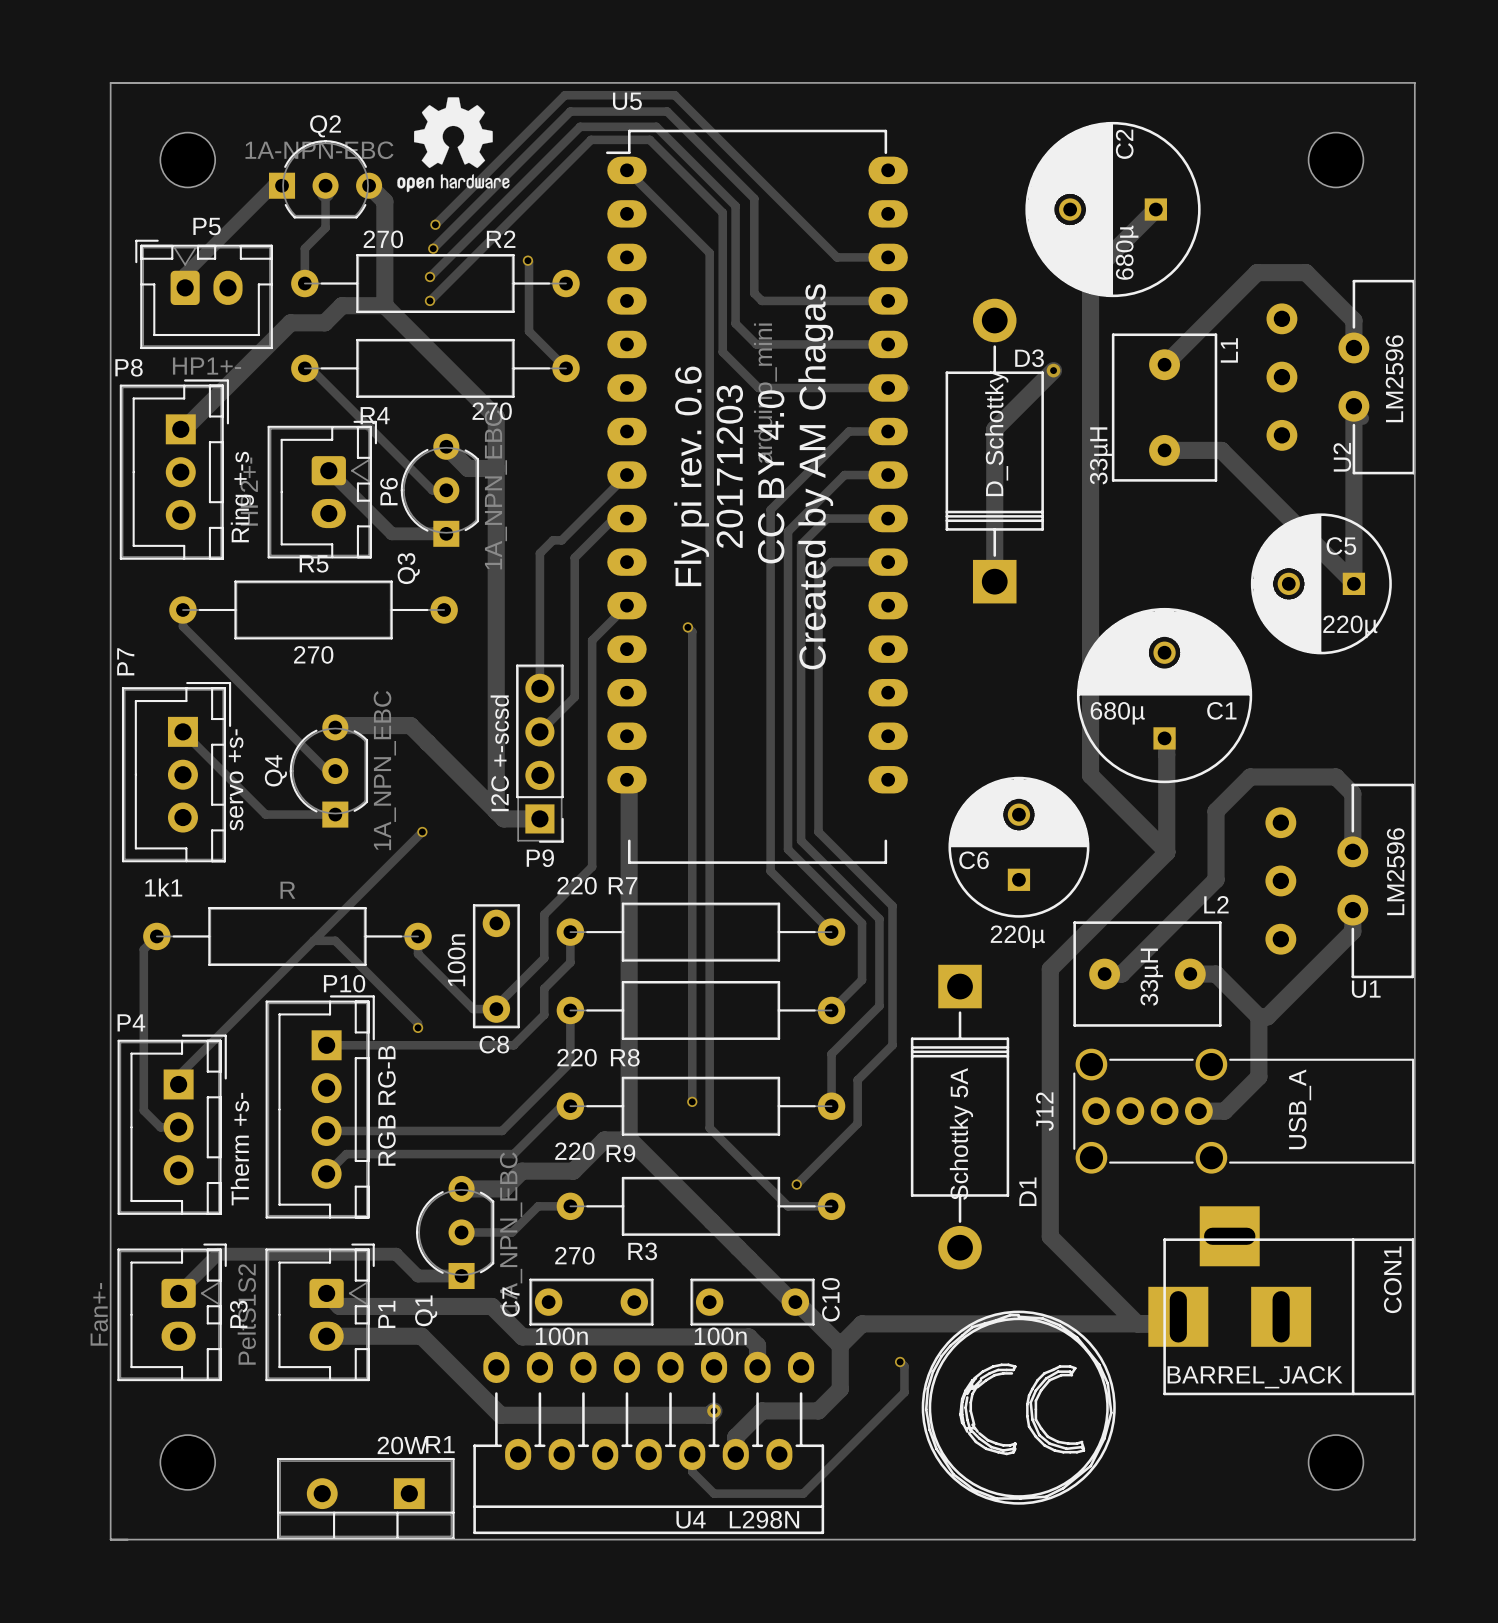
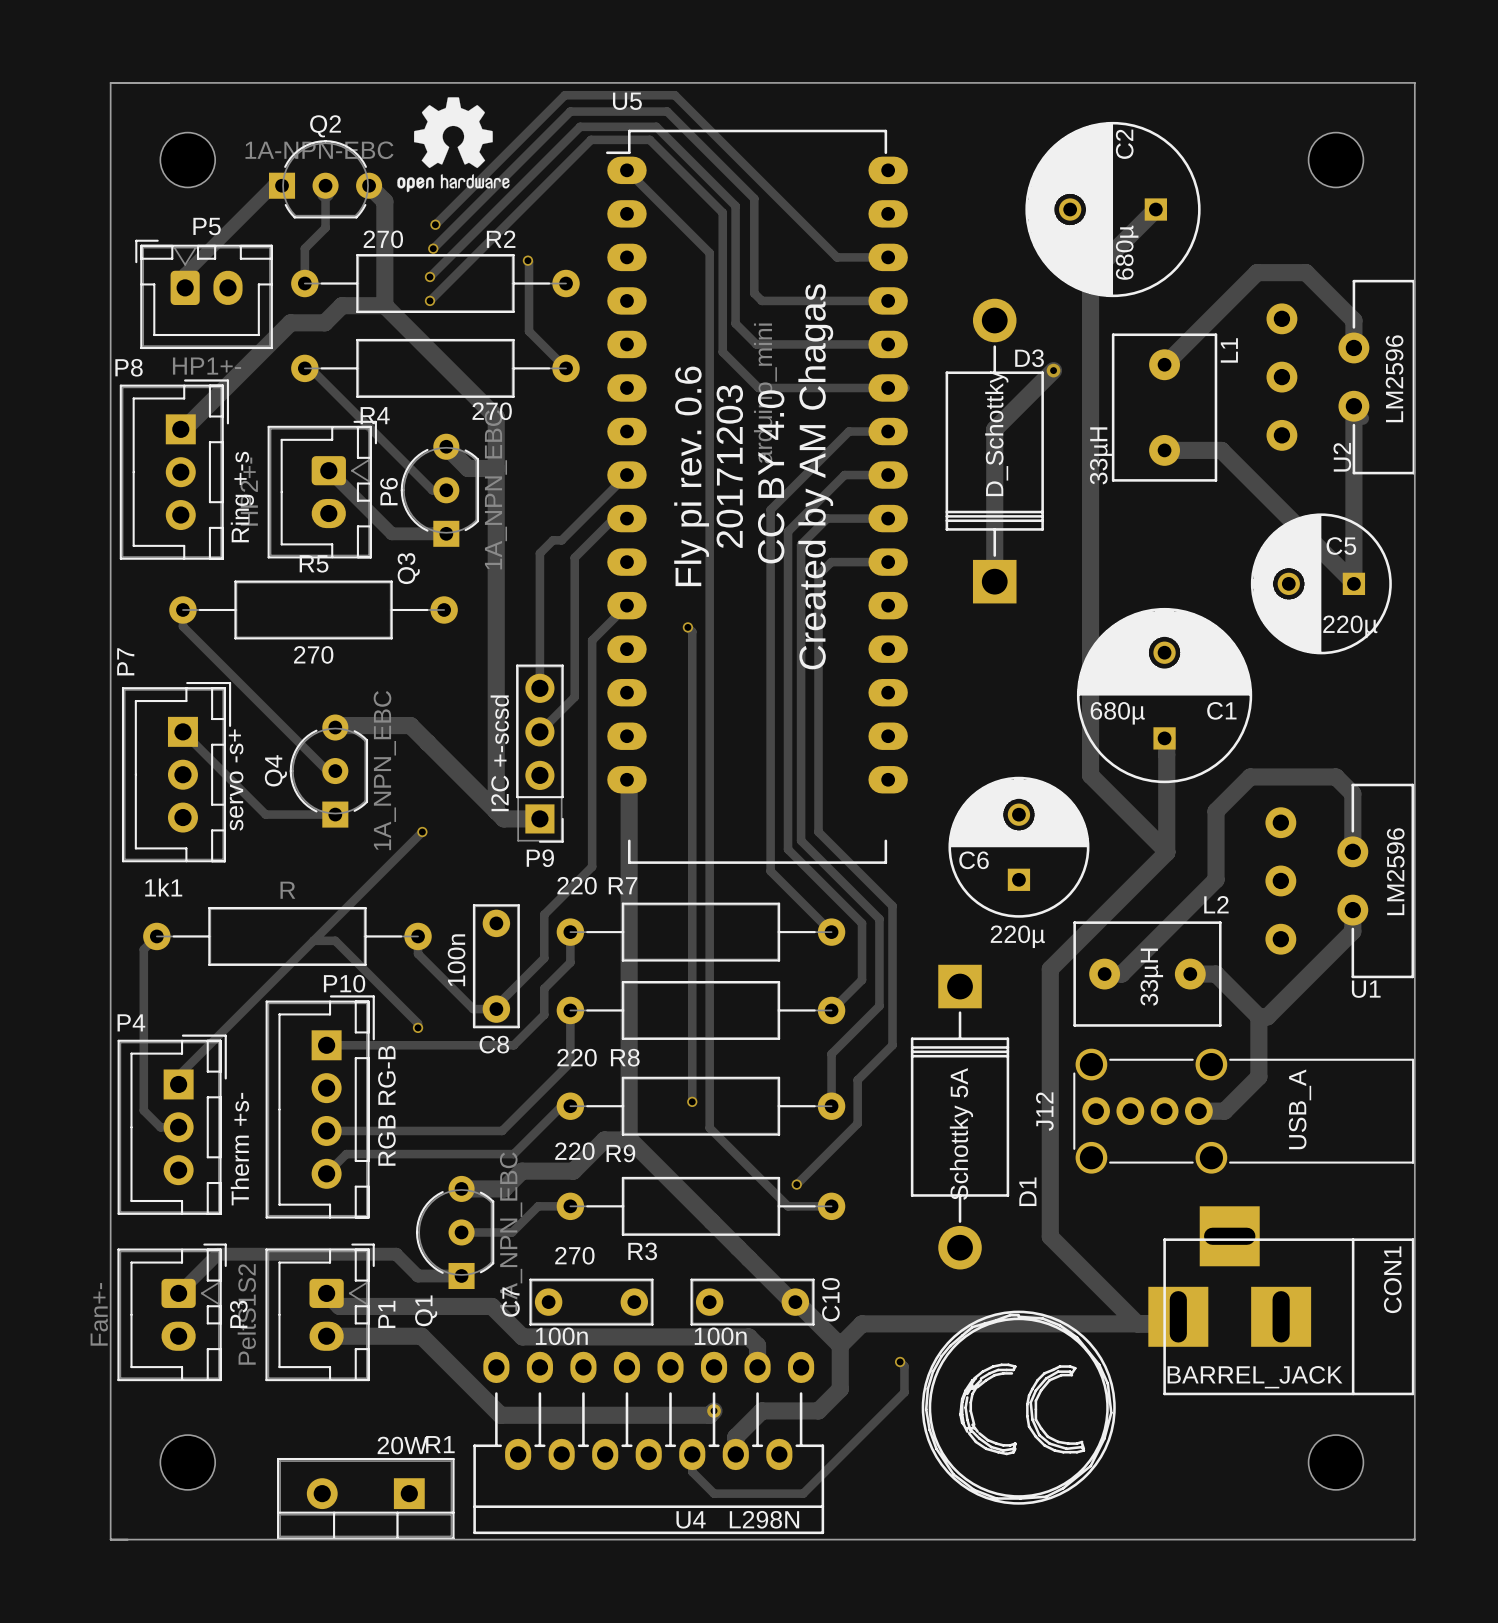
P7 value: servo +s- (236, 779) -> servo -s+ (236, 780)

